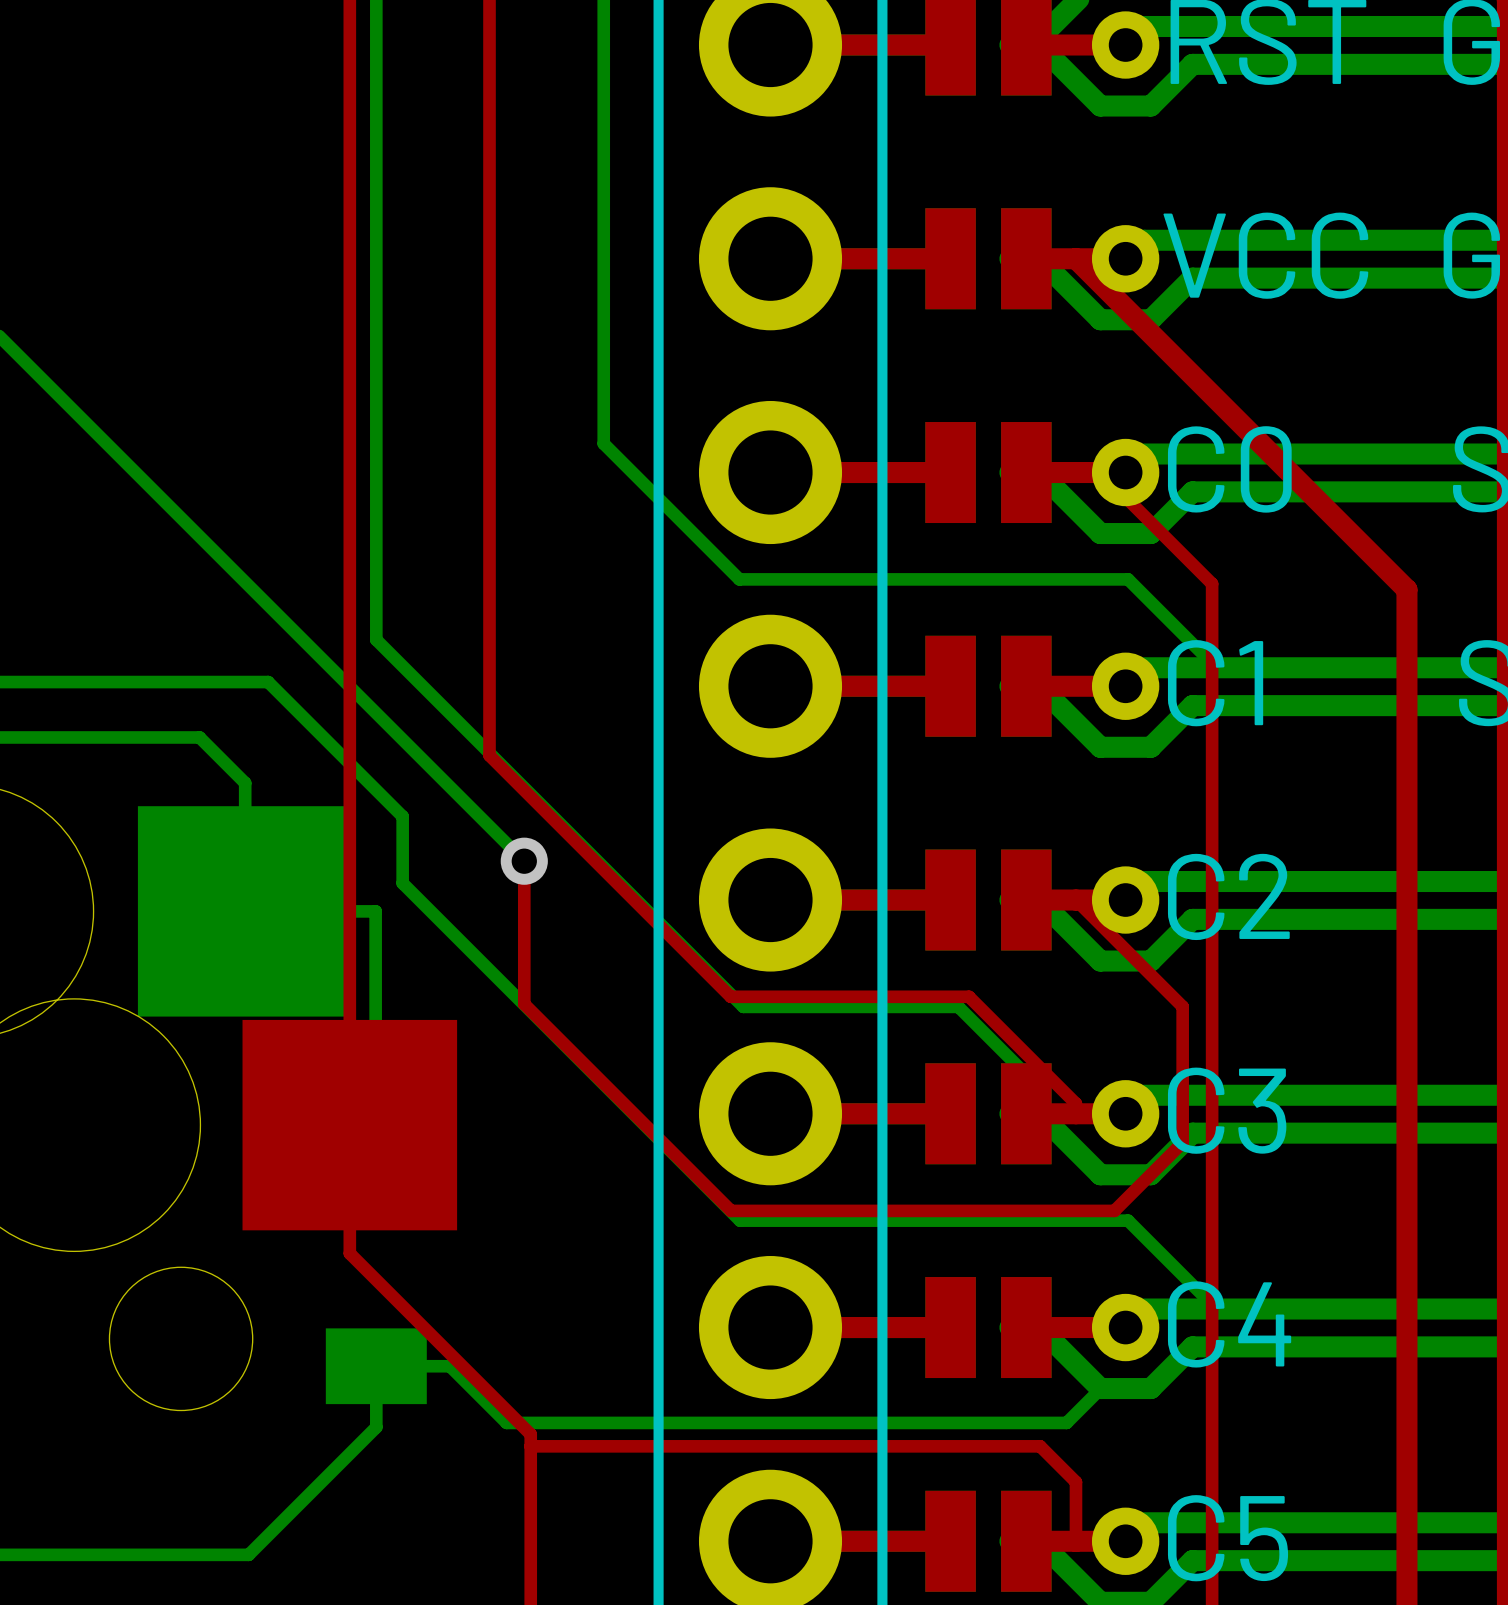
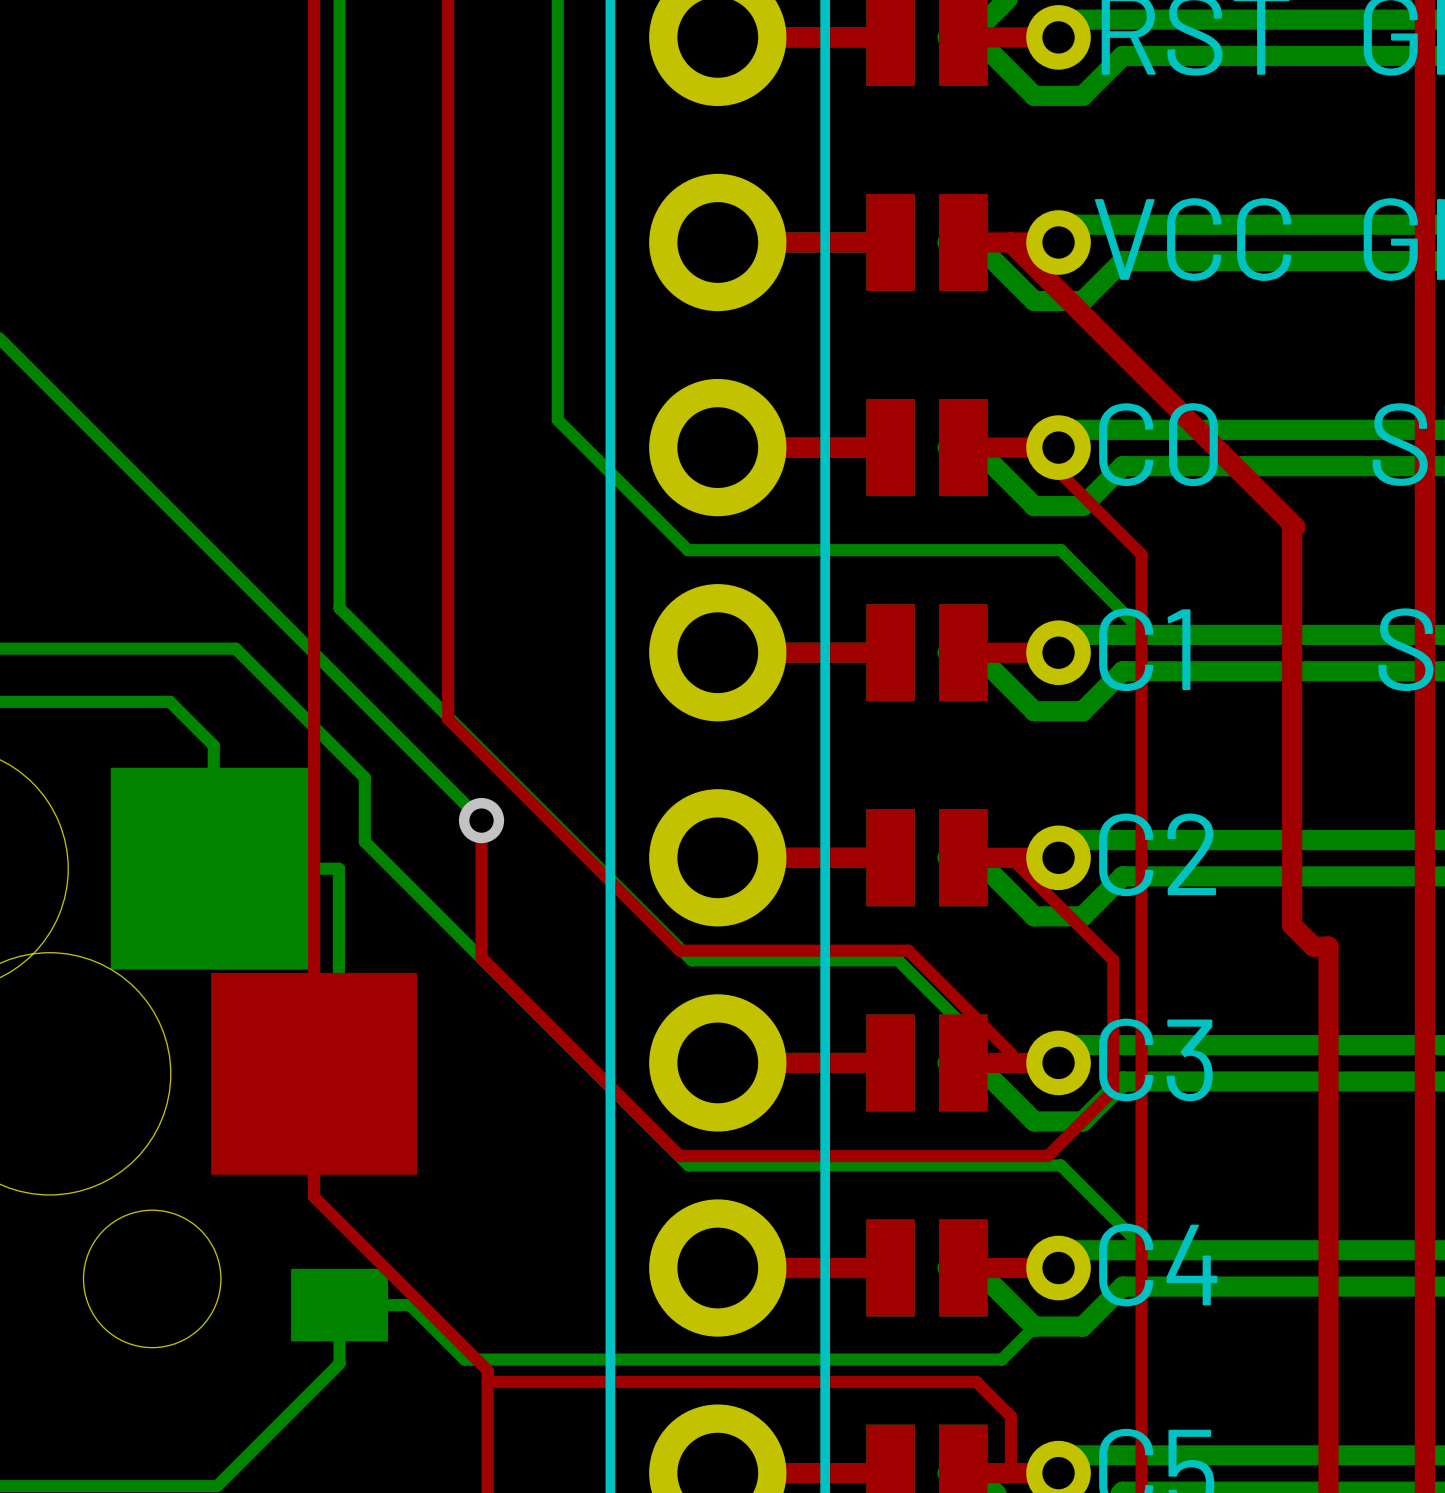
top track: (1372, 555) (1406, 589) (1406, 992) -> (1295, 526) (1292, 529) (1292, 925) (1313, 946) (1328, 946)

